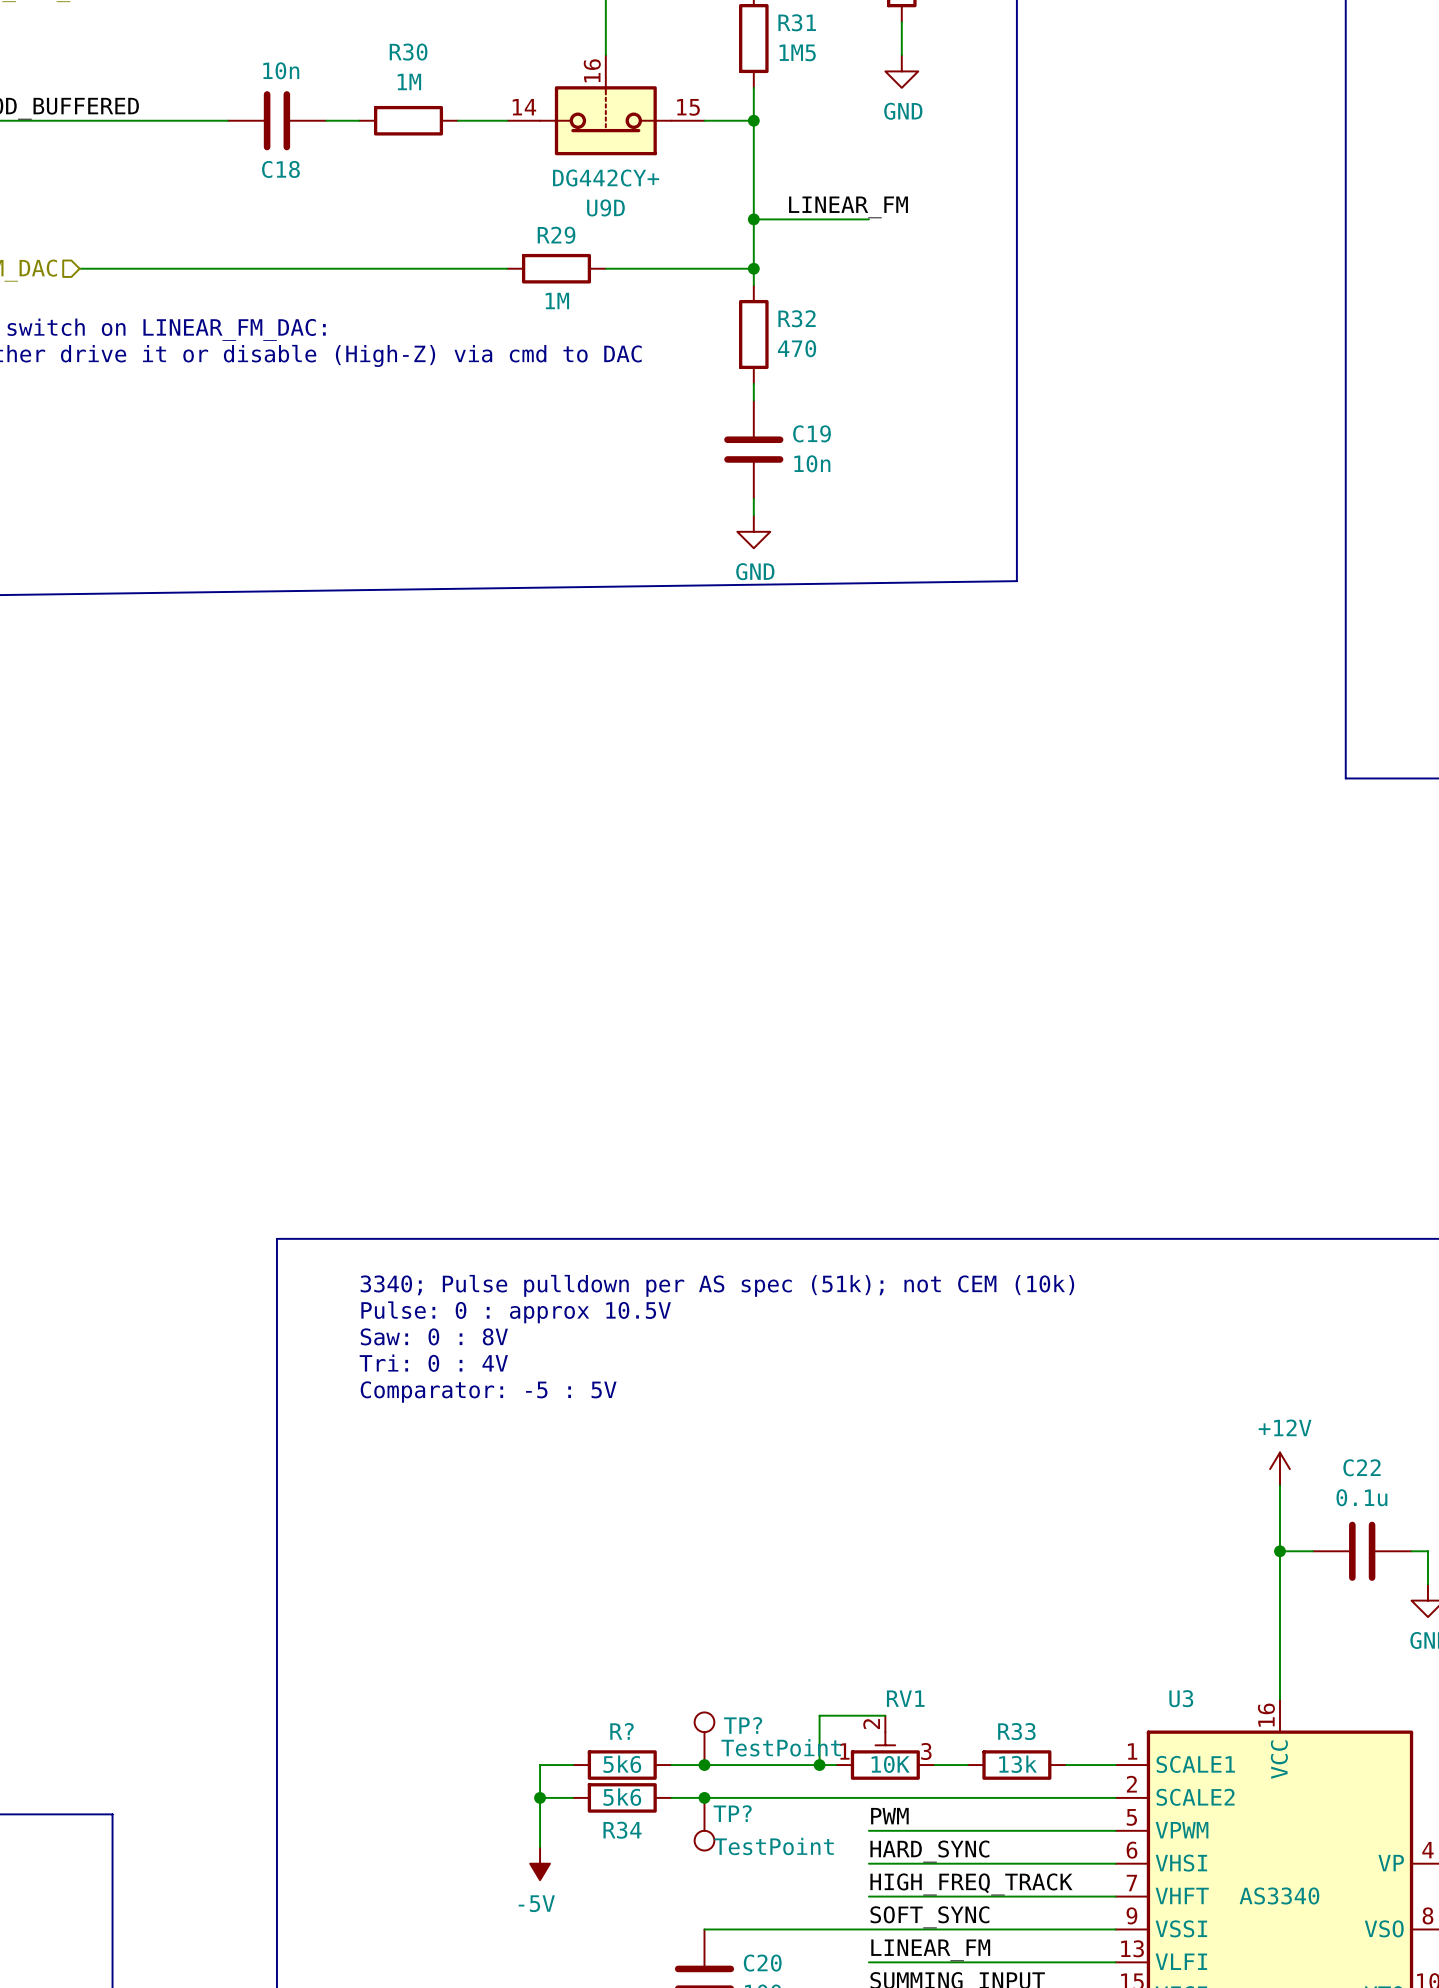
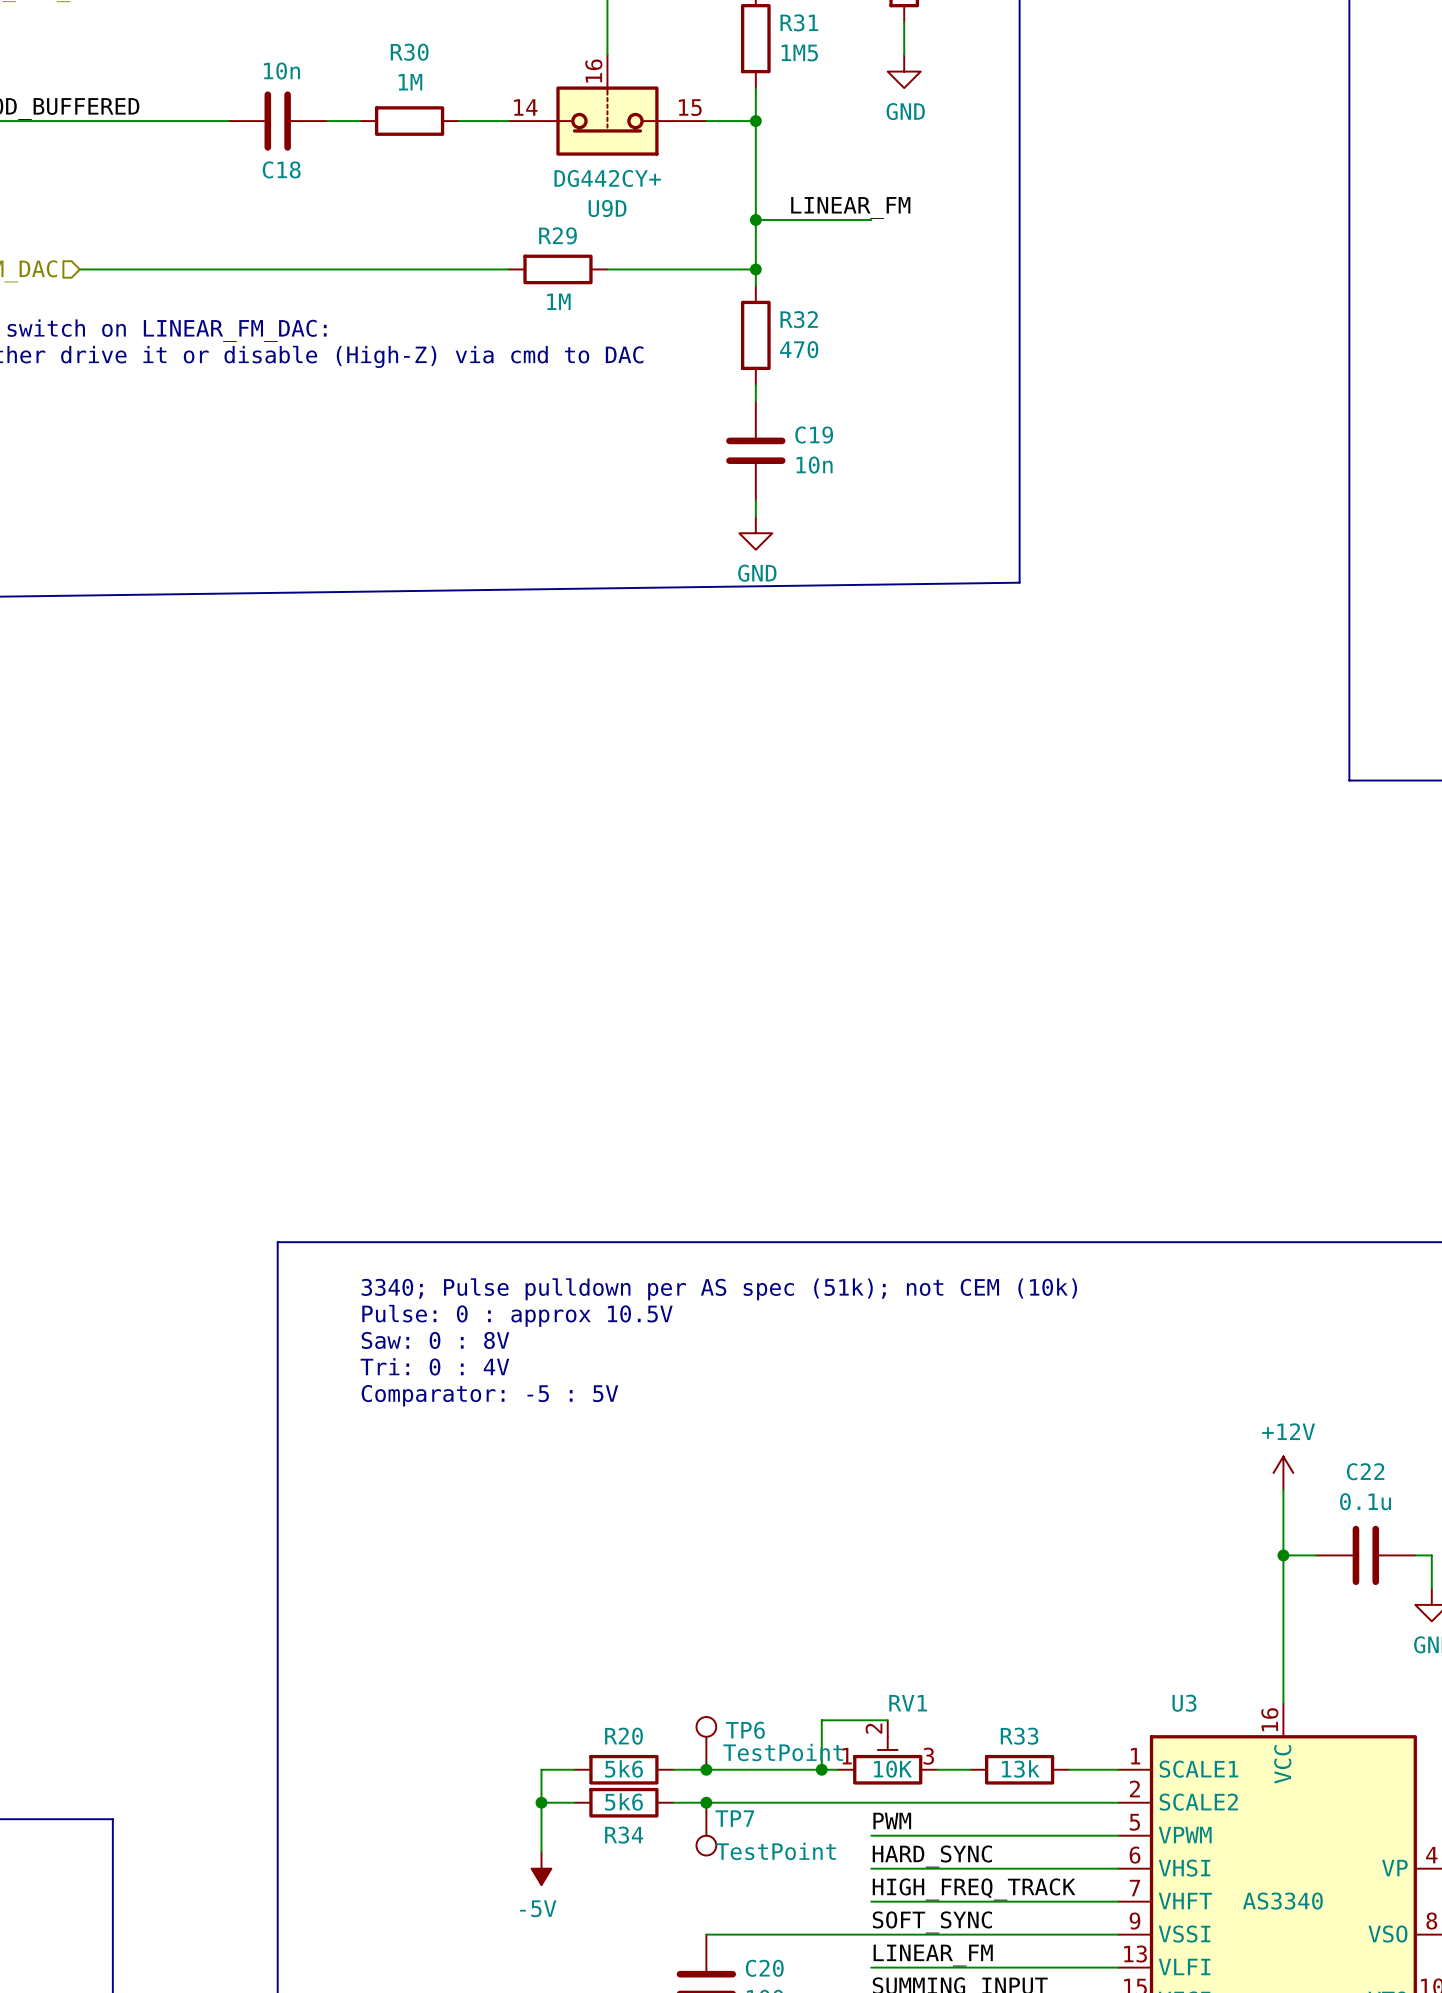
TP? name: TP? (743, 1725) -> TP6 (745, 1730)
R? name: R? (621, 1731) -> R20 (623, 1736)
TP? name: TP? (732, 1813) -> TP7 (734, 1818)

